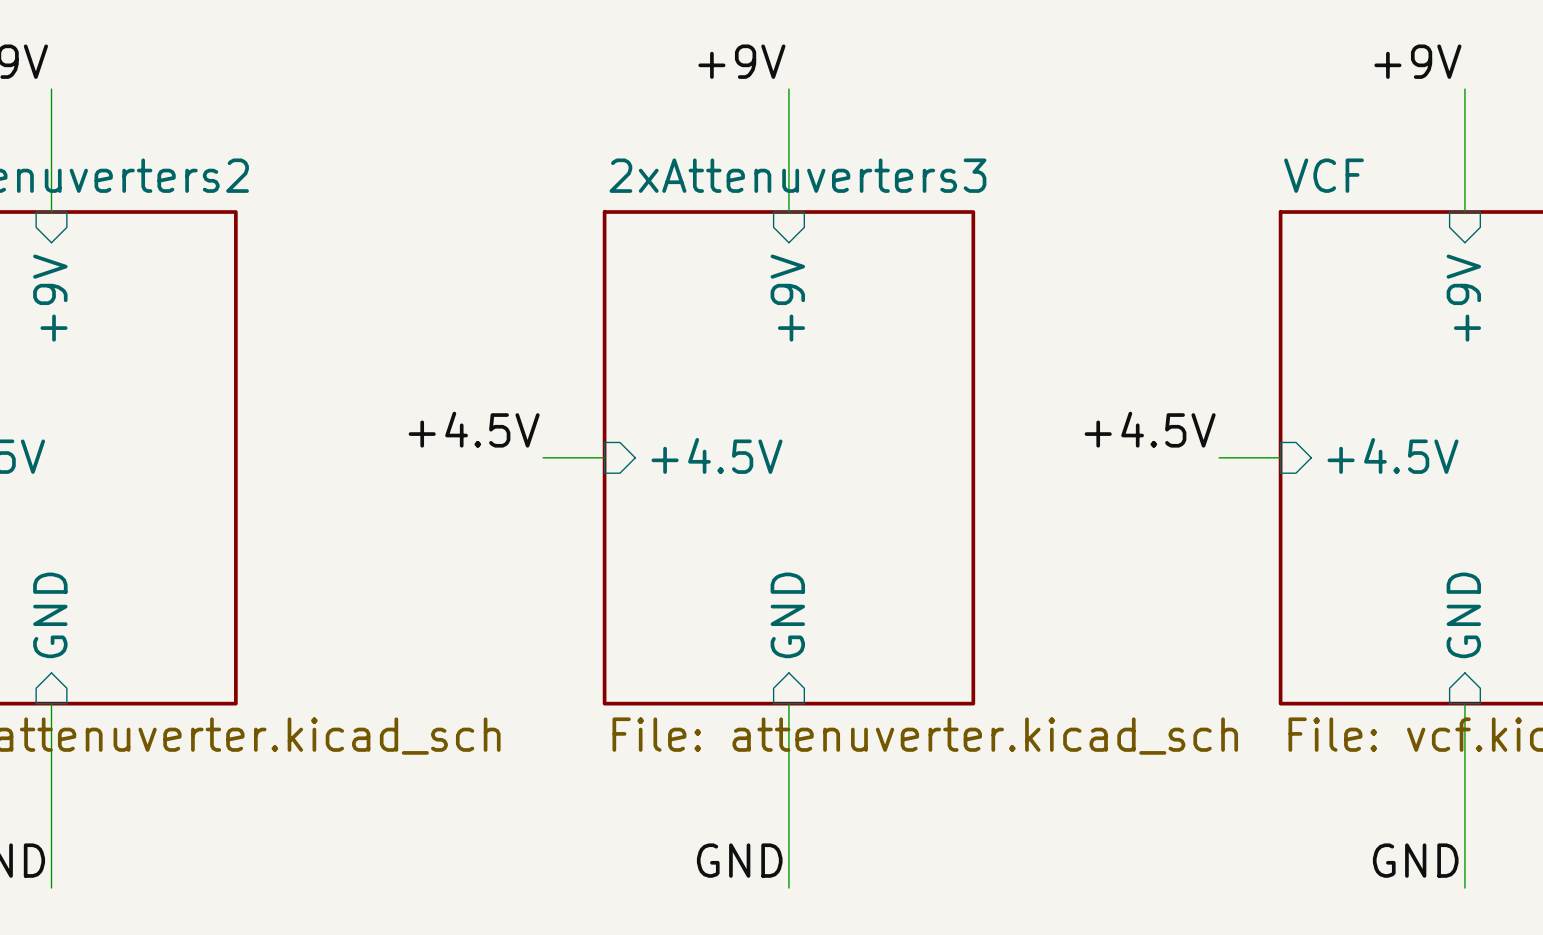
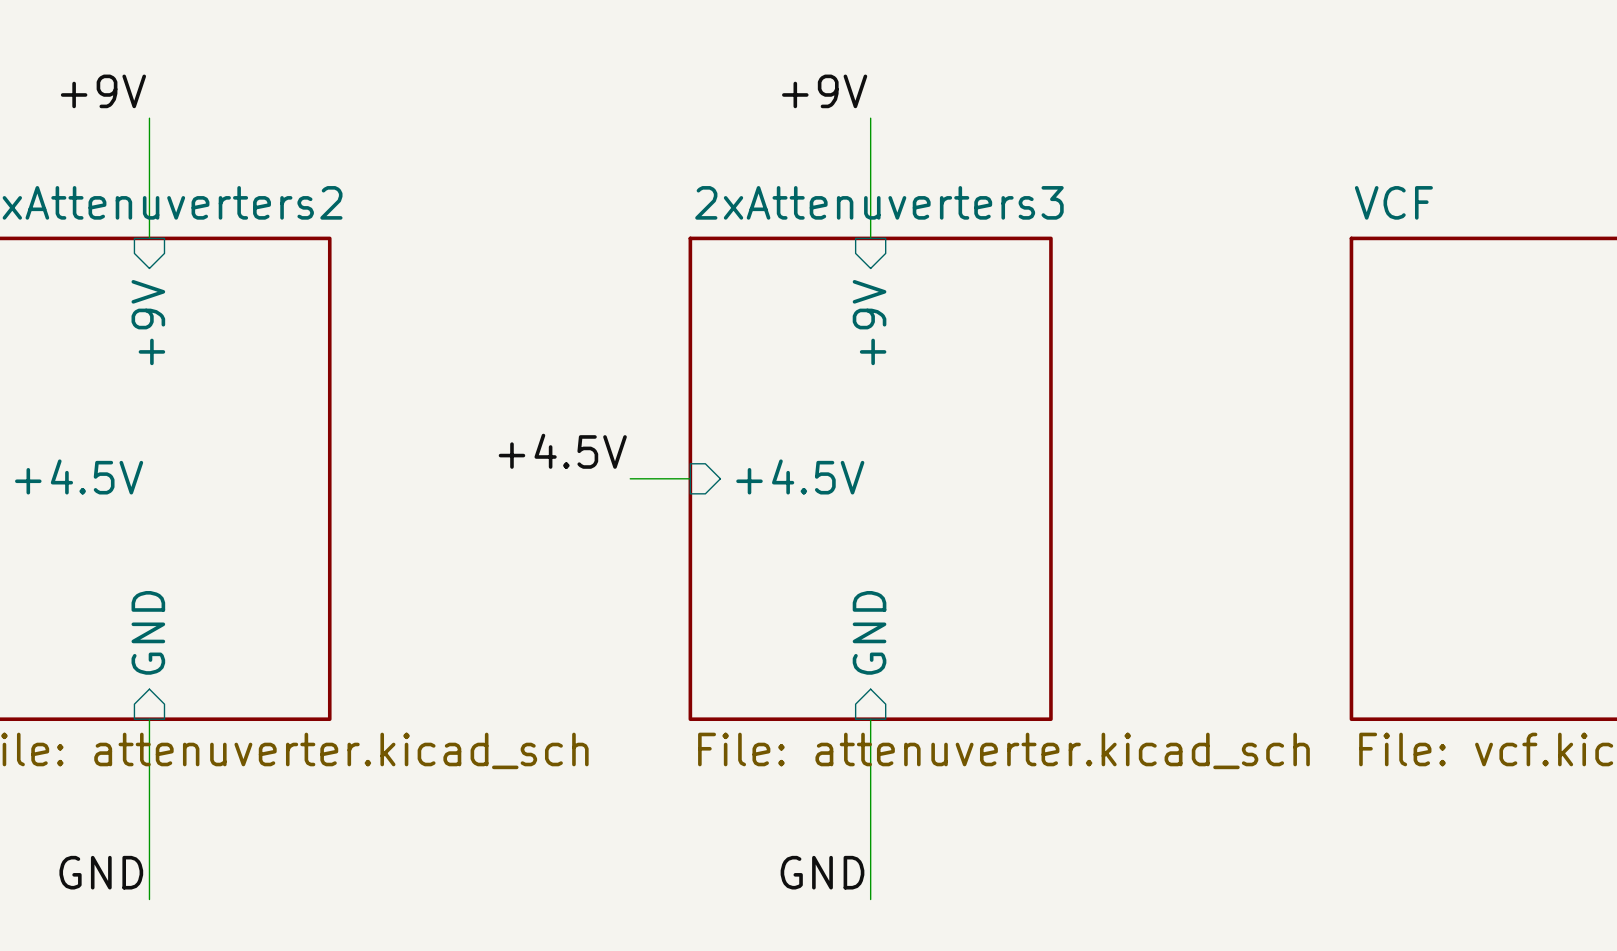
label: +9V (1417, 61) -> none
wire: (1464, 89) (1464, 212) -> none
sheet pin: +9V (1463, 298) -> none
label: +4.5V (1150, 429) -> none
sheet pin: +4.5V (1393, 455) -> none
wire: (1219, 457) (1280, 457) -> none
sheet pin: GND (1463, 615) -> none
wire: (1464, 703) (1464, 888) -> none
label: GND (1415, 860) -> none

